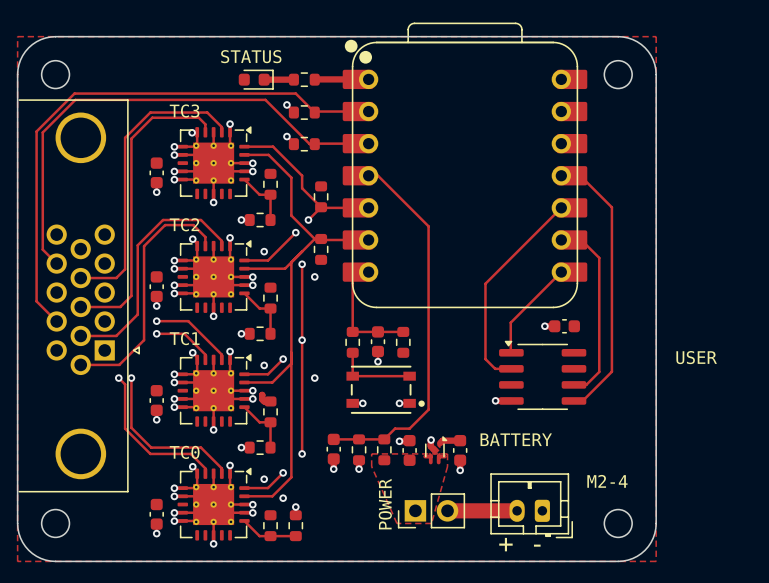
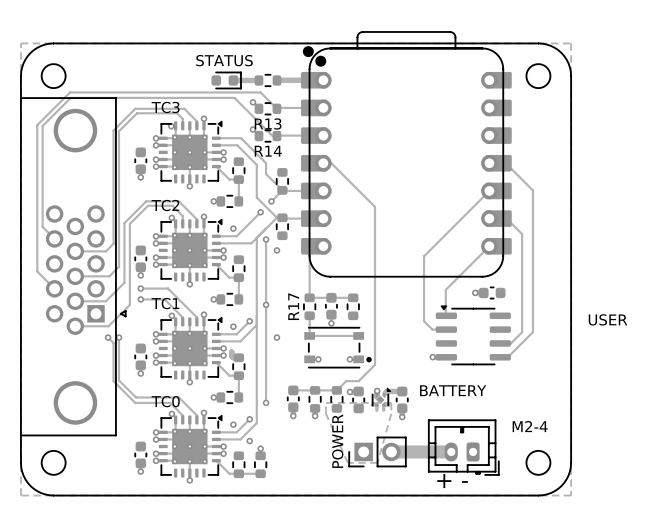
R13 name: none -> R13 (268, 123)
R14 name: none -> R14 (268, 151)
R17 name: none -> R17 (293, 306)

